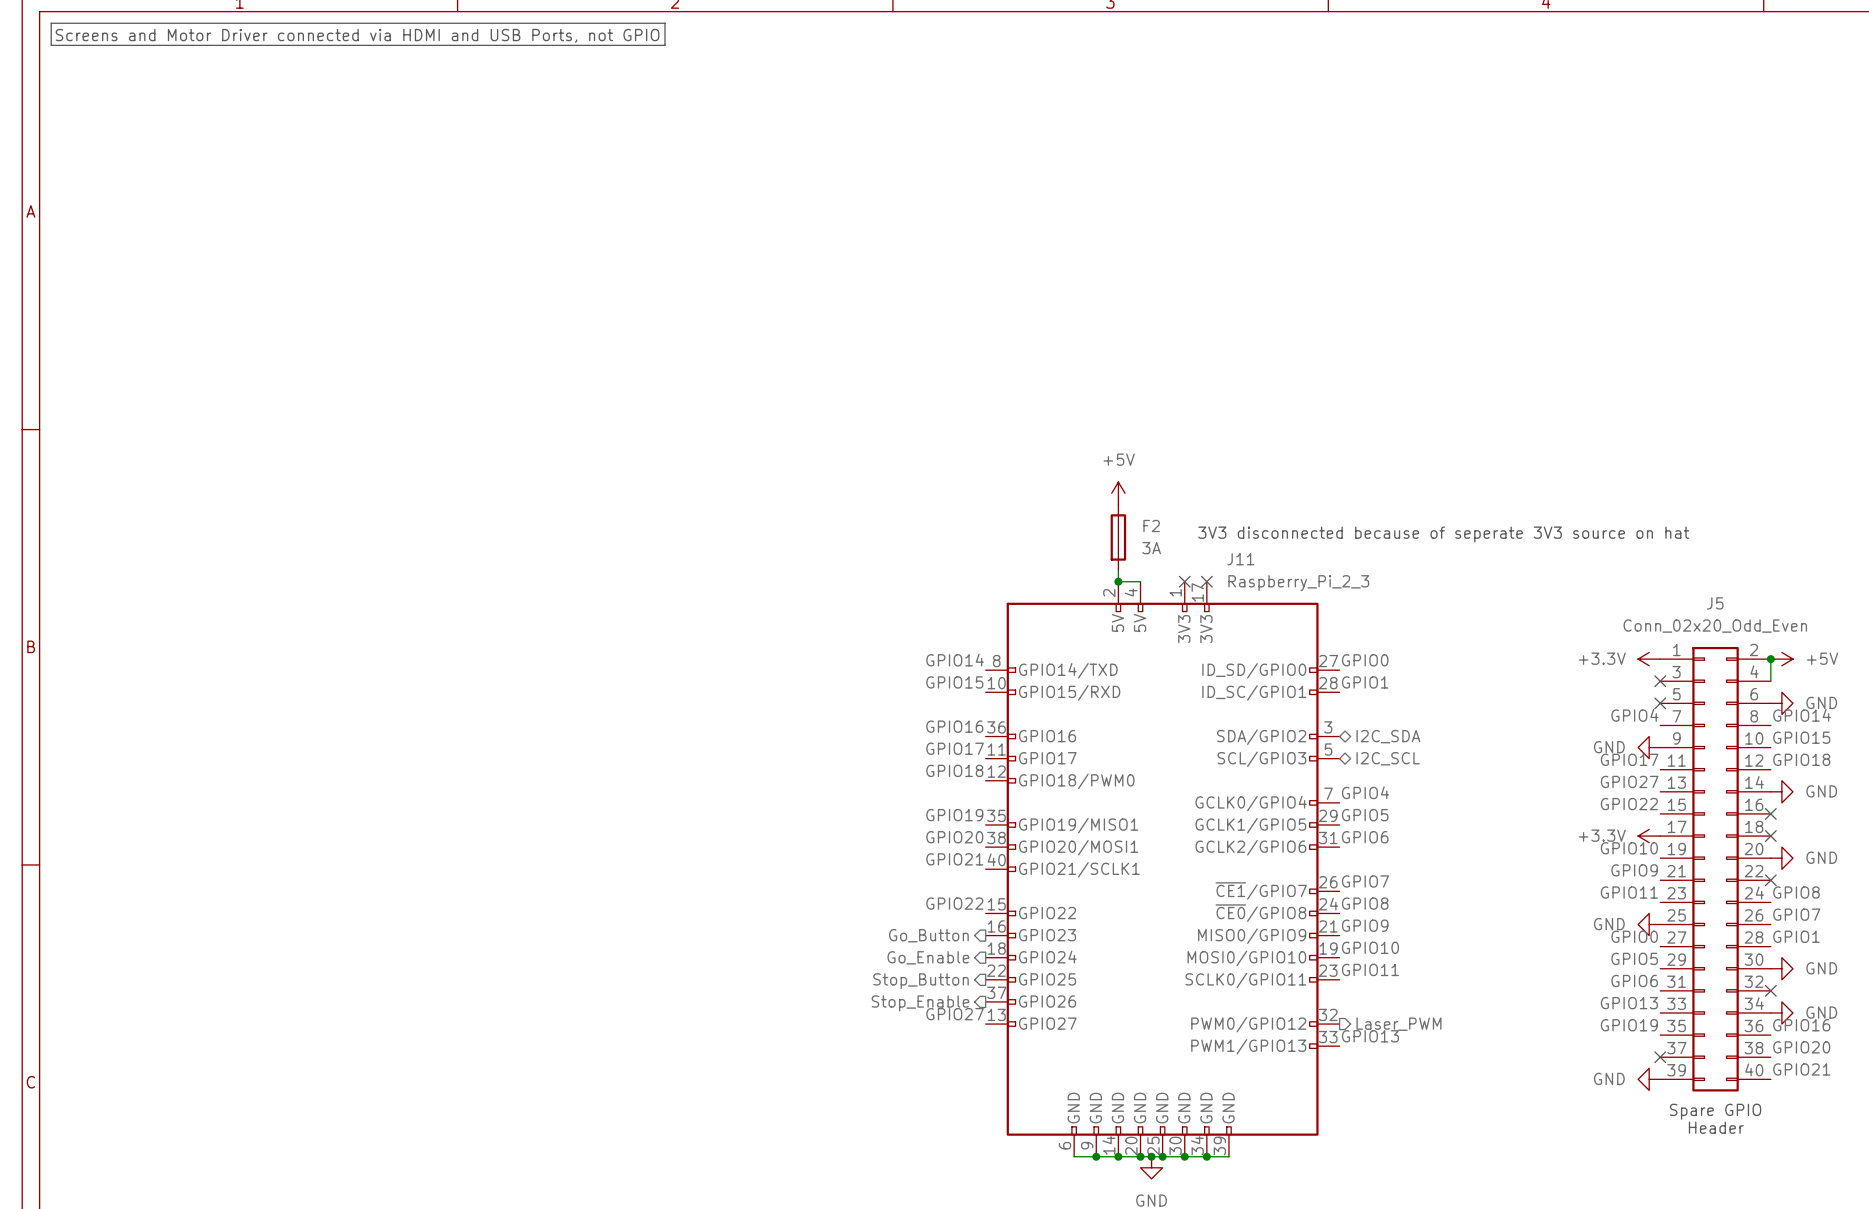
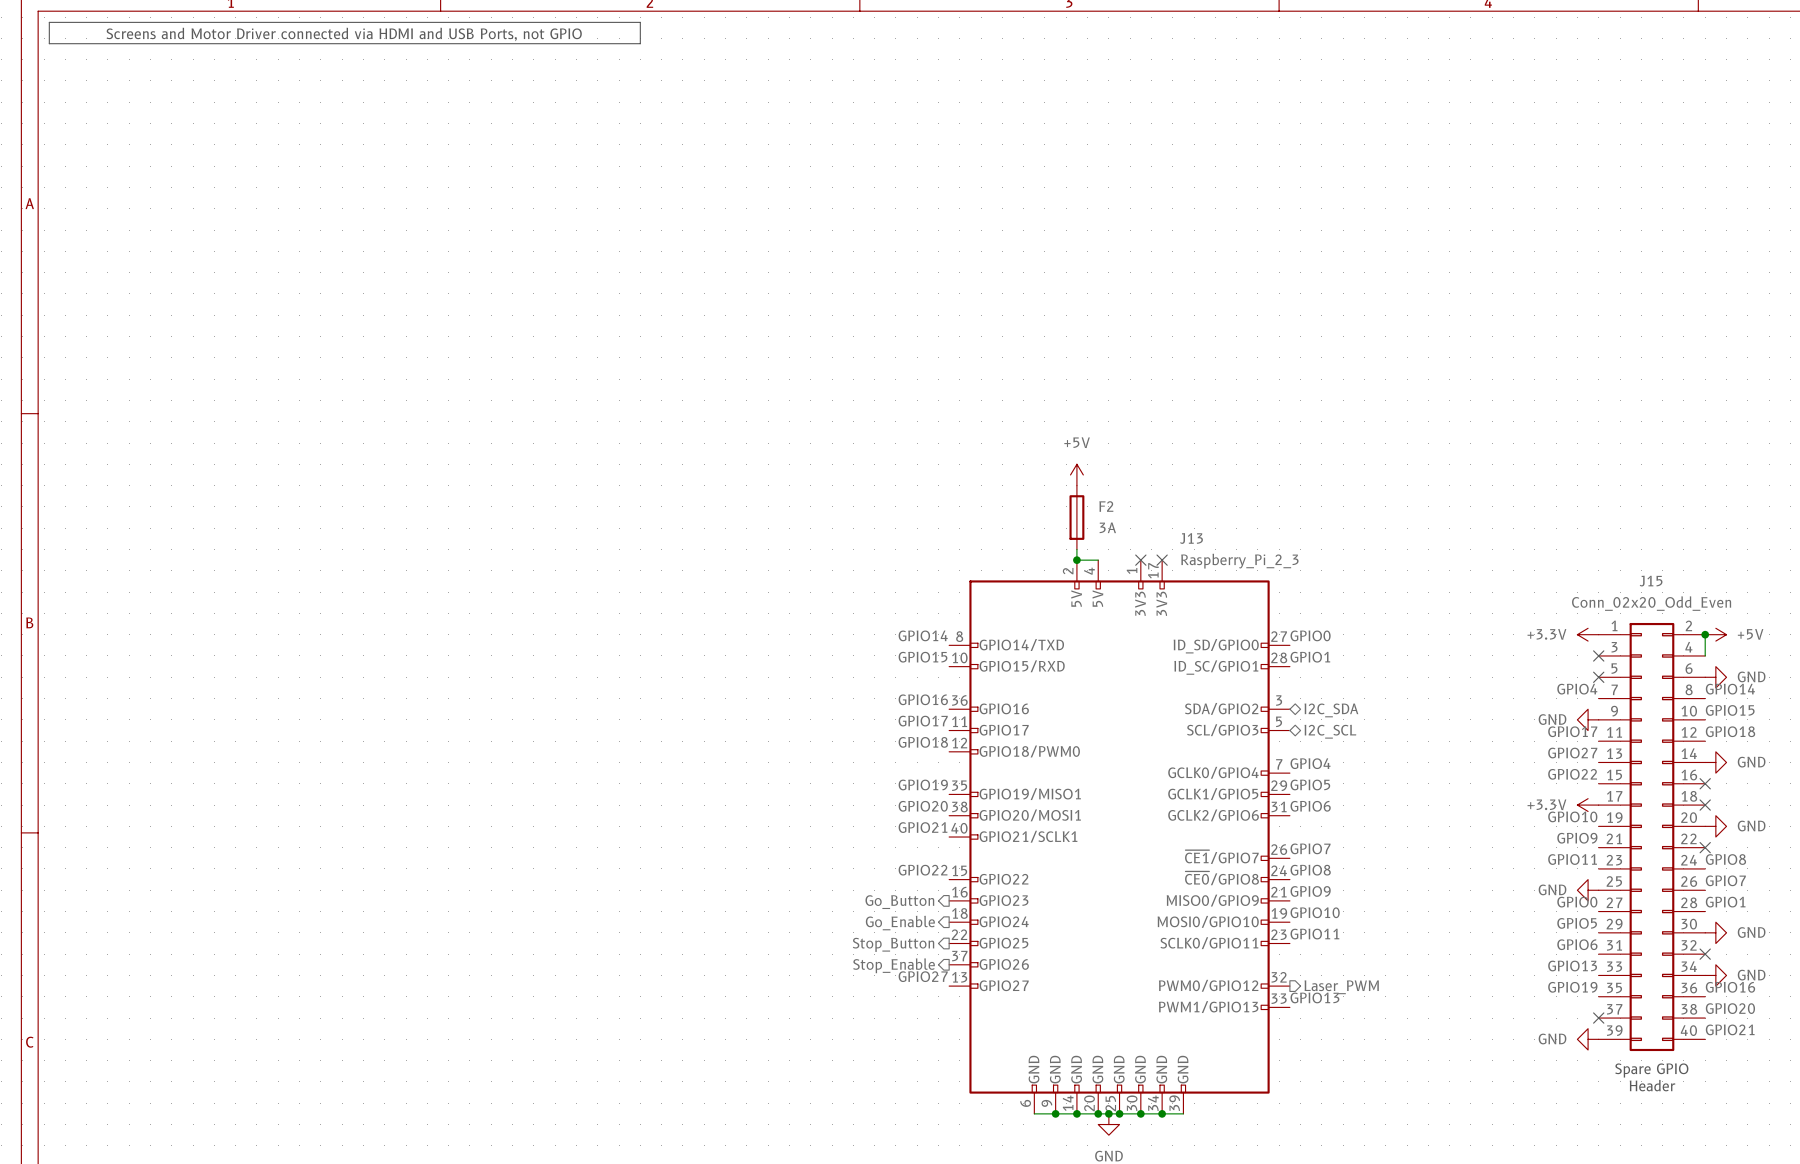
text: 3V3 disconnected because of seperate 3V3 source on hat (1443, 534) -> none
J11 name: J11 (1240, 559) -> J13 (1191, 538)
J5 name: J5 (1715, 603) -> J15 (1651, 581)

